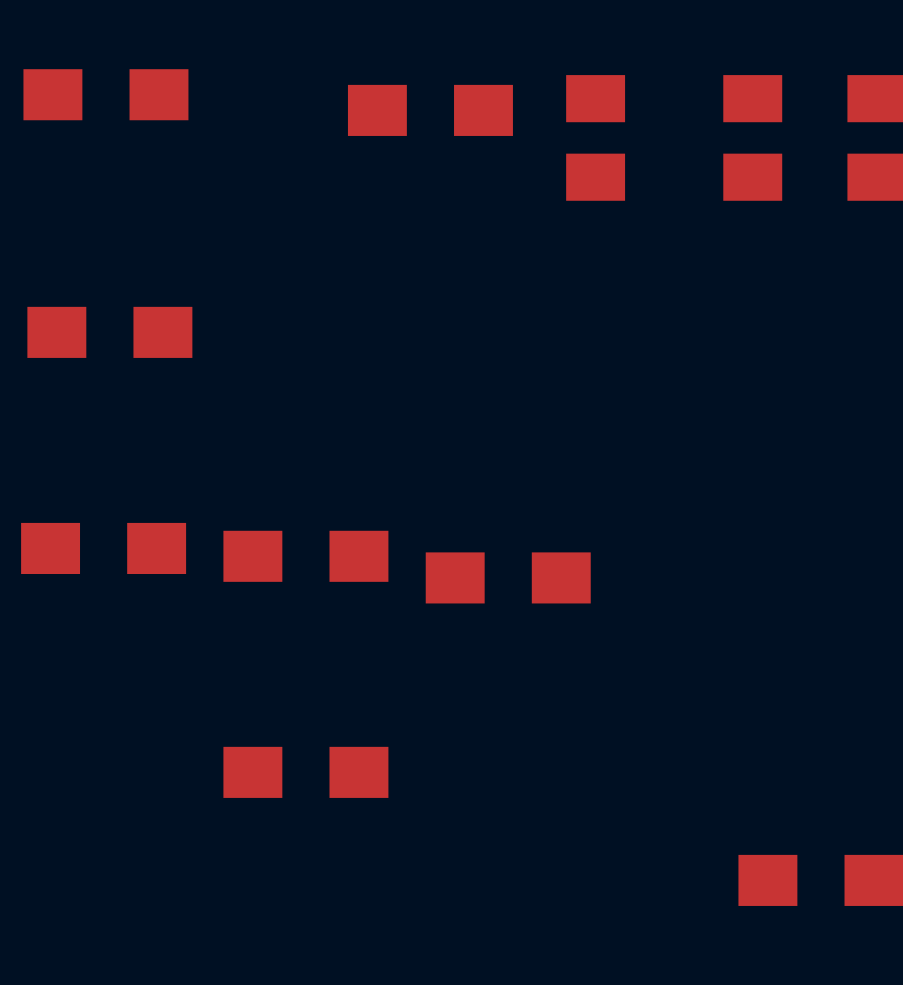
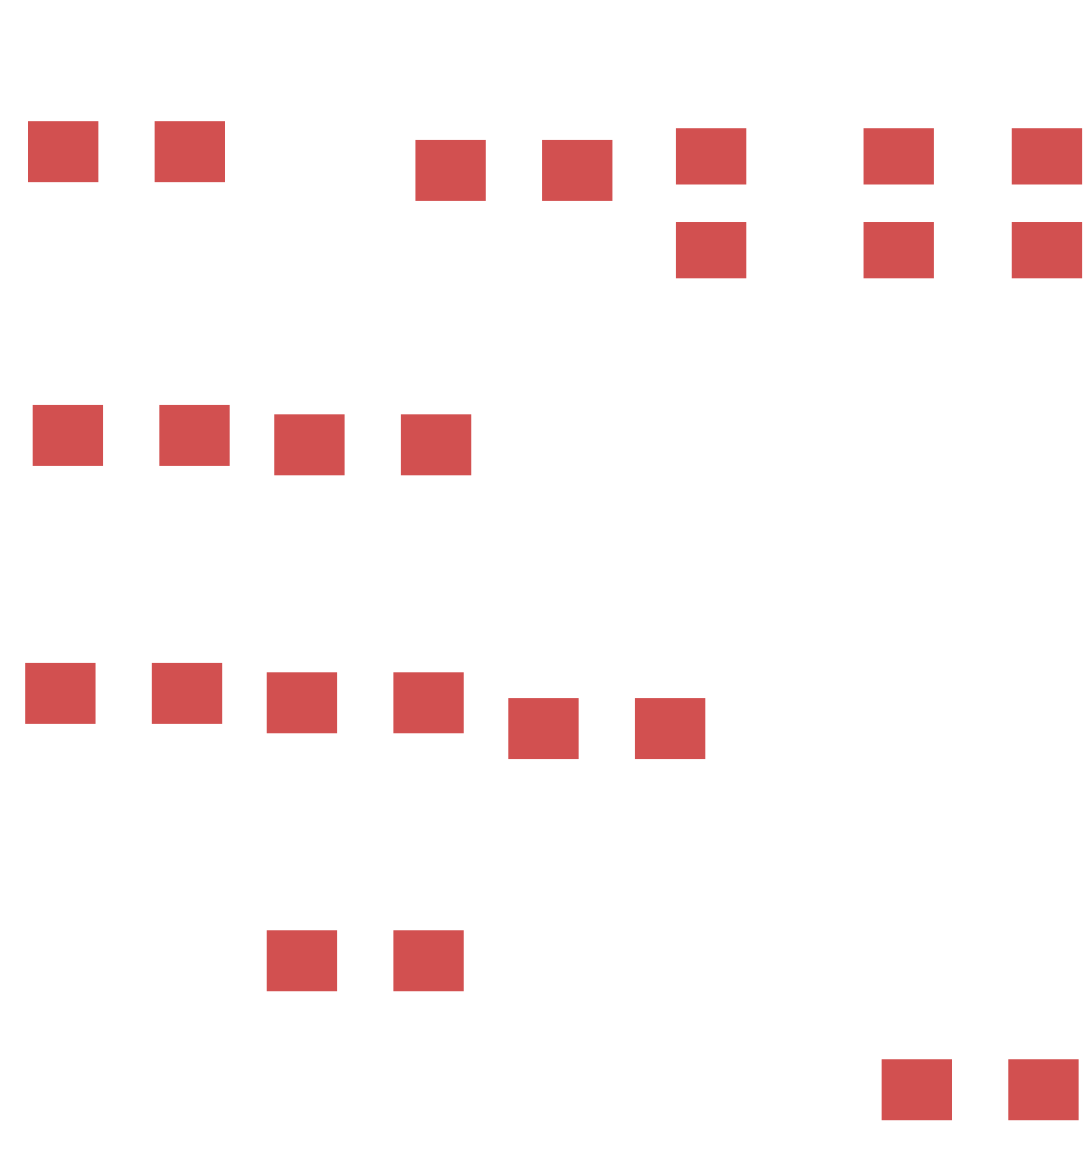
part: none -> (372, 444)

